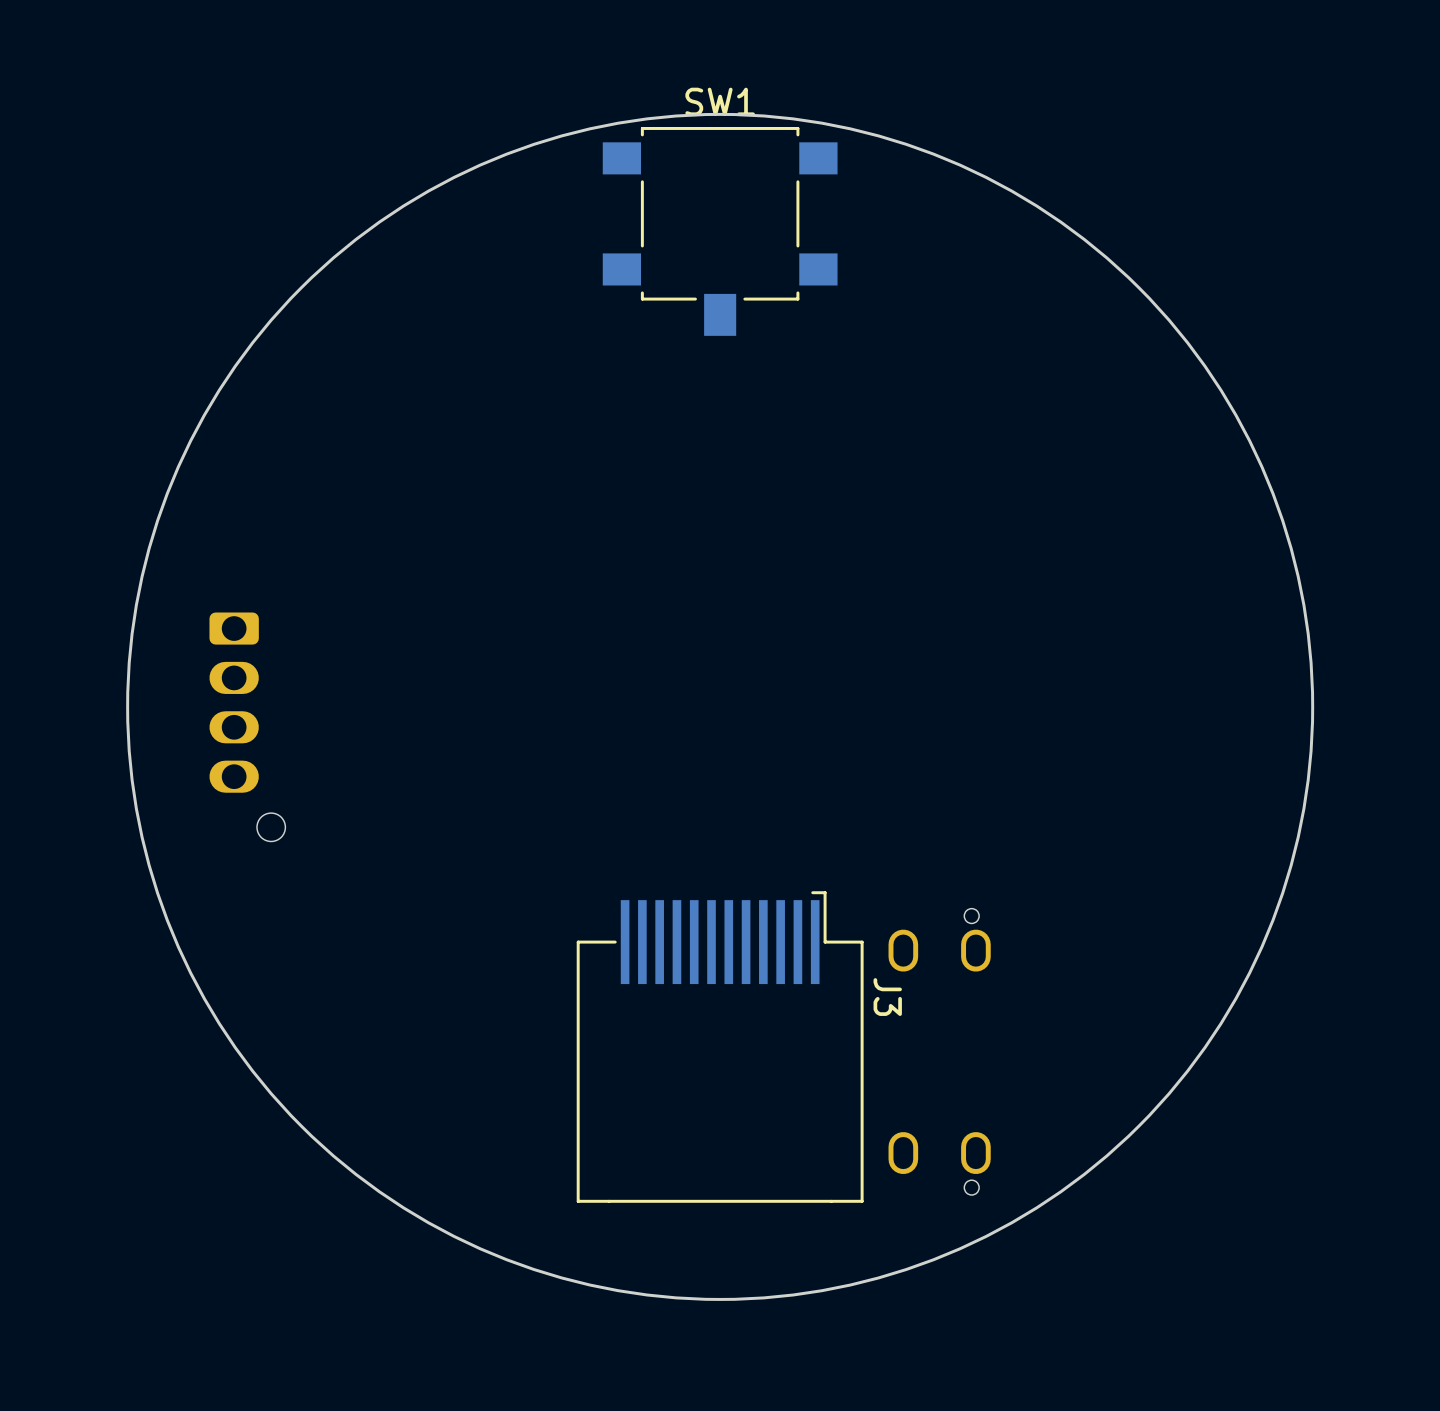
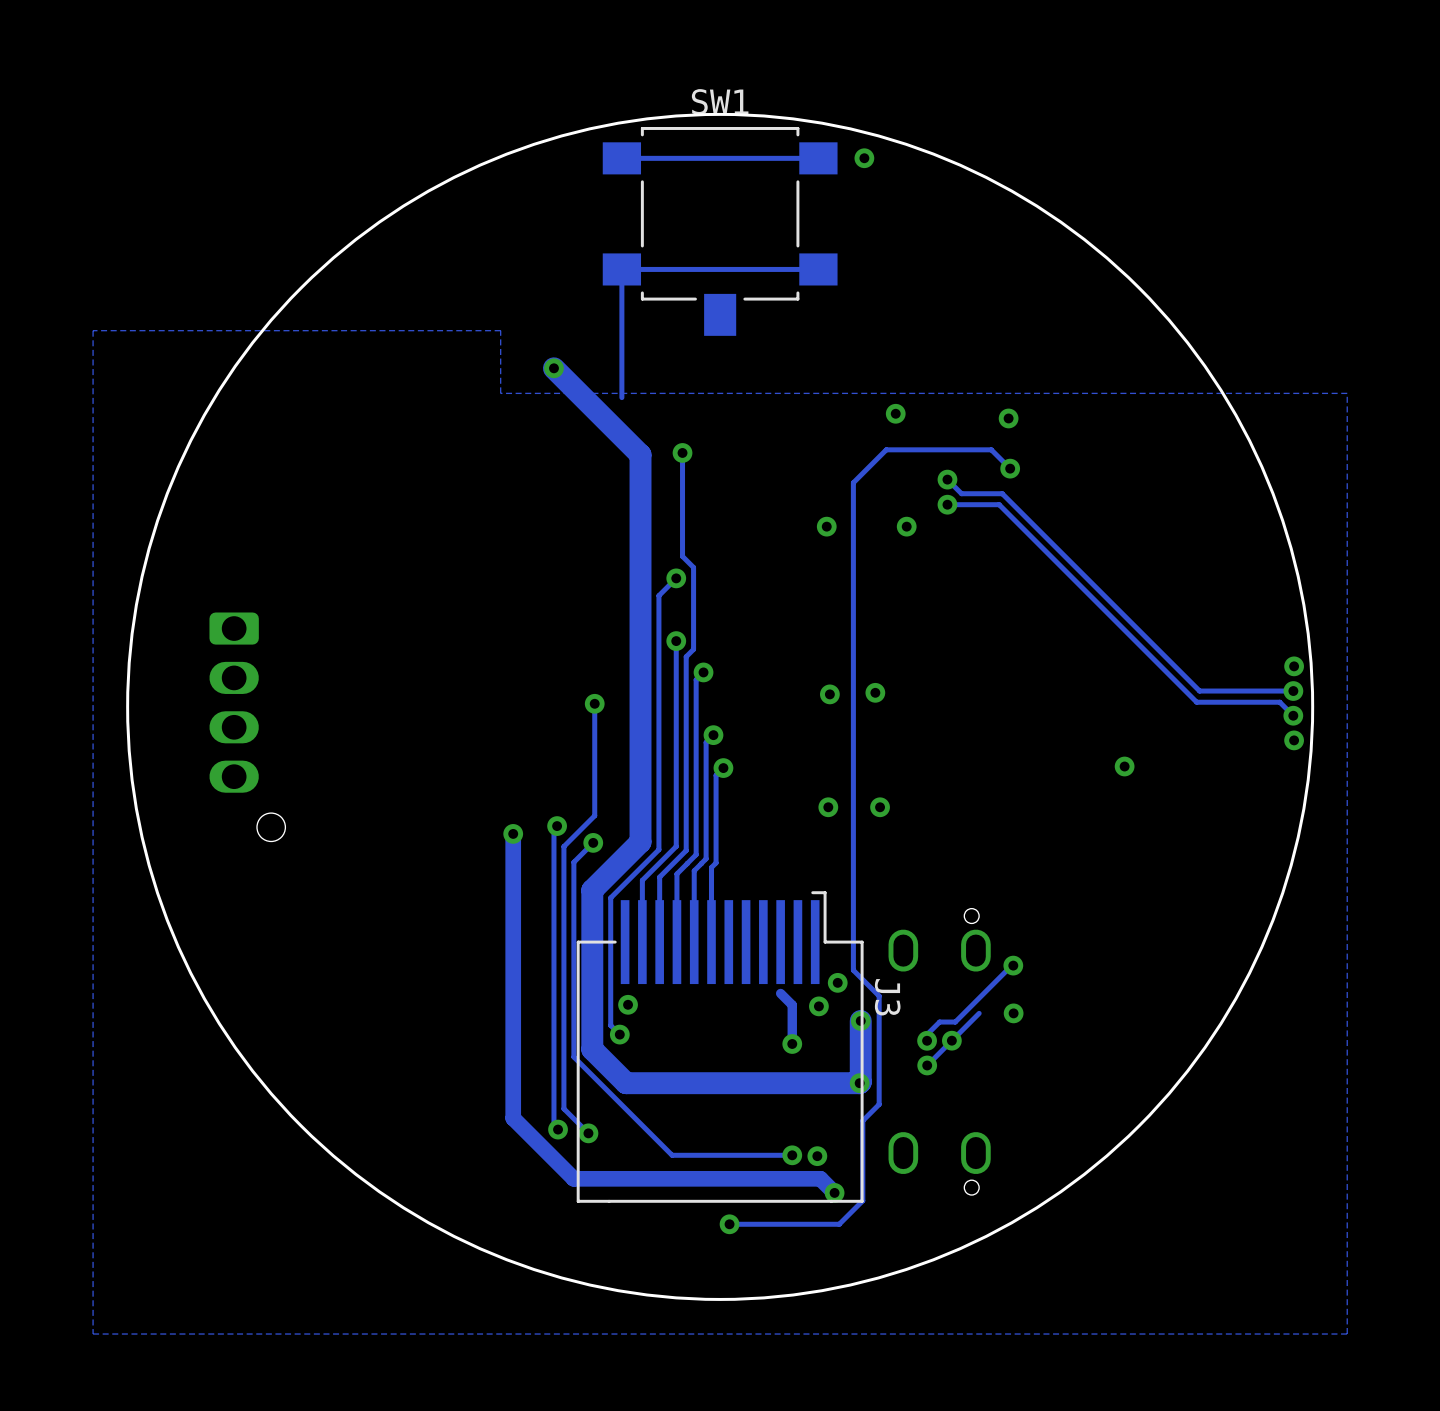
track: none -> (818, 158) (621, 158)
via: none -> (864, 158)
track: none -> (818, 269) (621, 269) (621, 397)
zone outline: none -> (500, 330) (500, 393) (1347, 393) (1347, 1334) (93, 1334) (93, 330) (500, 330)
track: none -> (553, 368) (640, 454) (640, 842) (592, 890) (592, 1049) (626, 1083) (859, 1083) (860, 1020)
via: none -> (553, 368)
via: none -> (895, 413)
via: none -> (1008, 418)
track: none -> (682, 452) (682, 556) (693, 567) (693, 649) (686, 656) (686, 850) (659, 877) (659, 942)
via: none -> (682, 452)
track: none -> (1010, 468) (991, 449) (886, 449) (853, 482) (853, 970) (879, 996) (879, 1104) (862, 1120) (862, 1200) (839, 1224) (729, 1224)
via: none -> (1010, 468)
track: none -> (947, 479) (961, 493) (1002, 493) (1199, 691) (1293, 691)
via: none -> (947, 479)
track: none -> (947, 504) (999, 504) (1196, 702) (1279, 702) (1293, 715)
via: none -> (947, 504)
via: none -> (826, 526)
via: none -> (906, 526)
track: none -> (676, 578) (658, 595) (658, 849) (610, 897) (610, 1025) (619, 1034)
via: none -> (676, 578)
track: none -> (676, 641) (676, 846) (642, 880) (642, 942)
via: none -> (676, 641)
via: none -> (1294, 666)
track: none -> (703, 672) (696, 679) (696, 854) (676, 873) (676, 942)
via: none -> (703, 672)
via: none -> (1293, 691)
via: none -> (875, 692)
via: none -> (829, 694)
track: none -> (594, 703) (594, 815) (563, 846) (563, 1108) (588, 1133)
via: none -> (594, 703)
via: none -> (1293, 715)
track: none -> (713, 735) (706, 742) (706, 858) (694, 870) (694, 942)
via: none -> (713, 735)
via: none -> (1294, 740)
via: none -> (1124, 766)
track: none -> (723, 768) (716, 775) (716, 862) (711, 867) (711, 942)
via: none -> (723, 768)
via: none -> (828, 807)
via: none -> (880, 807)
track: none -> (557, 826) (553, 829) (553, 1125) (558, 1129)
via: none -> (557, 826)
track: none -> (513, 833) (513, 1118) (573, 1178) (820, 1178) (834, 1192)
via: none -> (513, 833)
track: none -> (593, 842) (573, 862) (573, 1057) (672, 1155) (792, 1155)
via: none -> (593, 842)
track: none -> (1013, 965) (955, 1022) (939, 1022) (927, 1034) (927, 1040)
via: none -> (1013, 965)
via: none -> (837, 982)
track: none -> (780, 993) (792, 1005) (792, 1043)
via: none -> (628, 1004)
via: none -> (818, 1006)
track: none -> (979, 1013) (927, 1065)
via: none -> (1013, 1013)
via: none -> (860, 1020)
via: none -> (619, 1034)
via: none -> (927, 1040)
via: none -> (951, 1040)
via: none -> (792, 1043)
via: none -> (927, 1065)
via: none -> (859, 1083)
via: none -> (558, 1129)
via: none -> (588, 1133)
via: none -> (792, 1155)
via: none -> (817, 1156)
via: none -> (834, 1192)
via: none -> (729, 1224)

